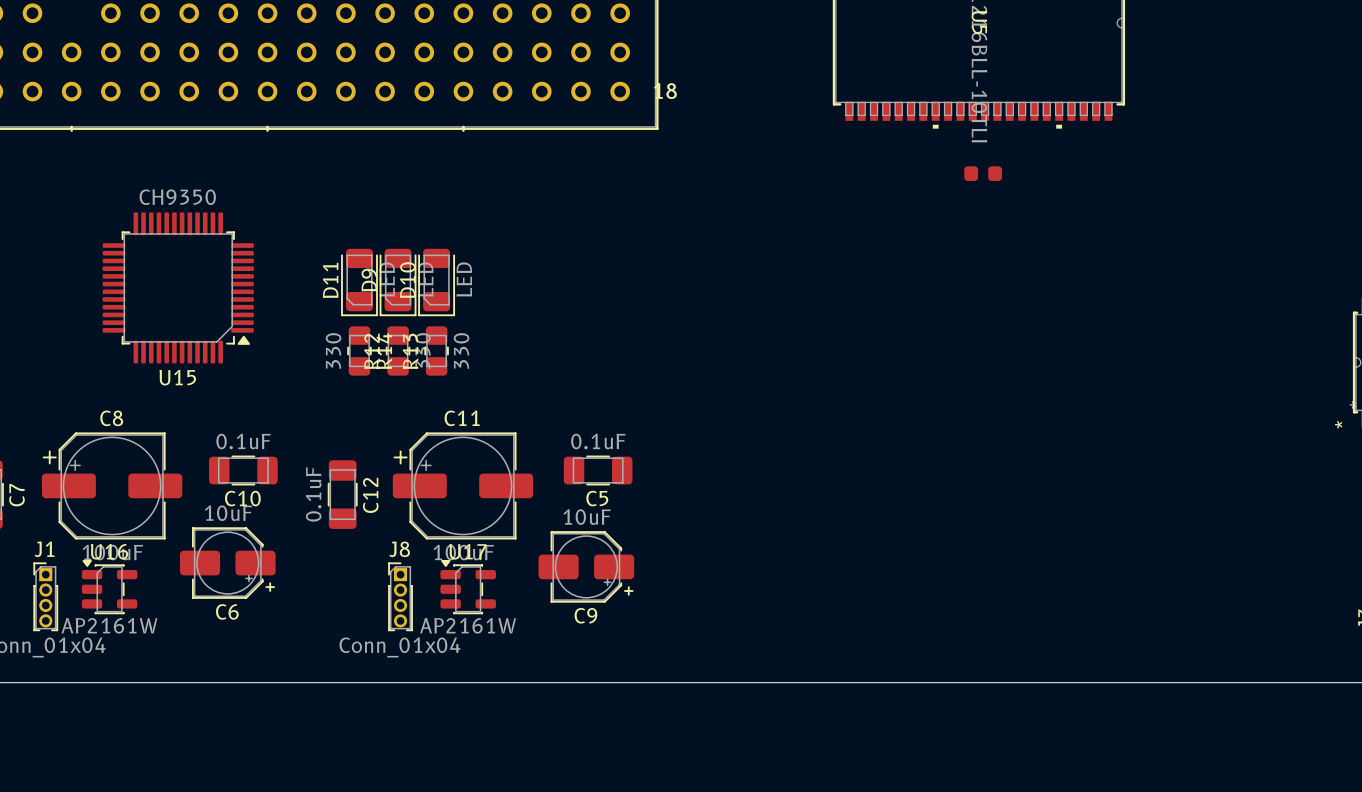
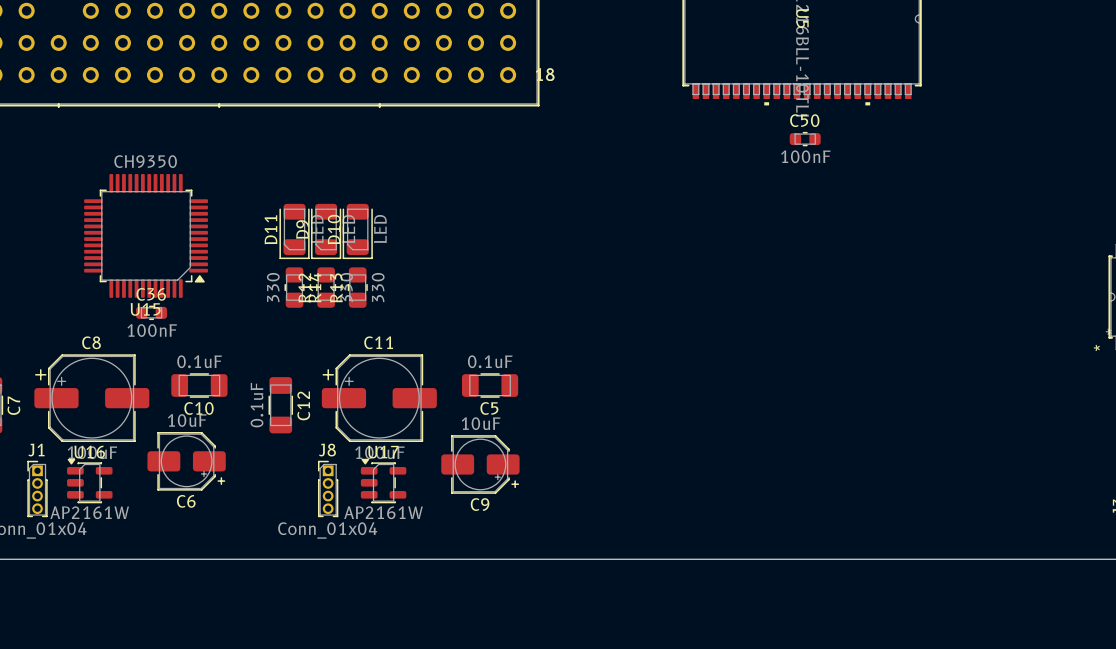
C50: none -> 100nF (805, 139)
part: (971, 173) -> none
part: (995, 173) -> none
C36: none -> 100nF (151, 312)

